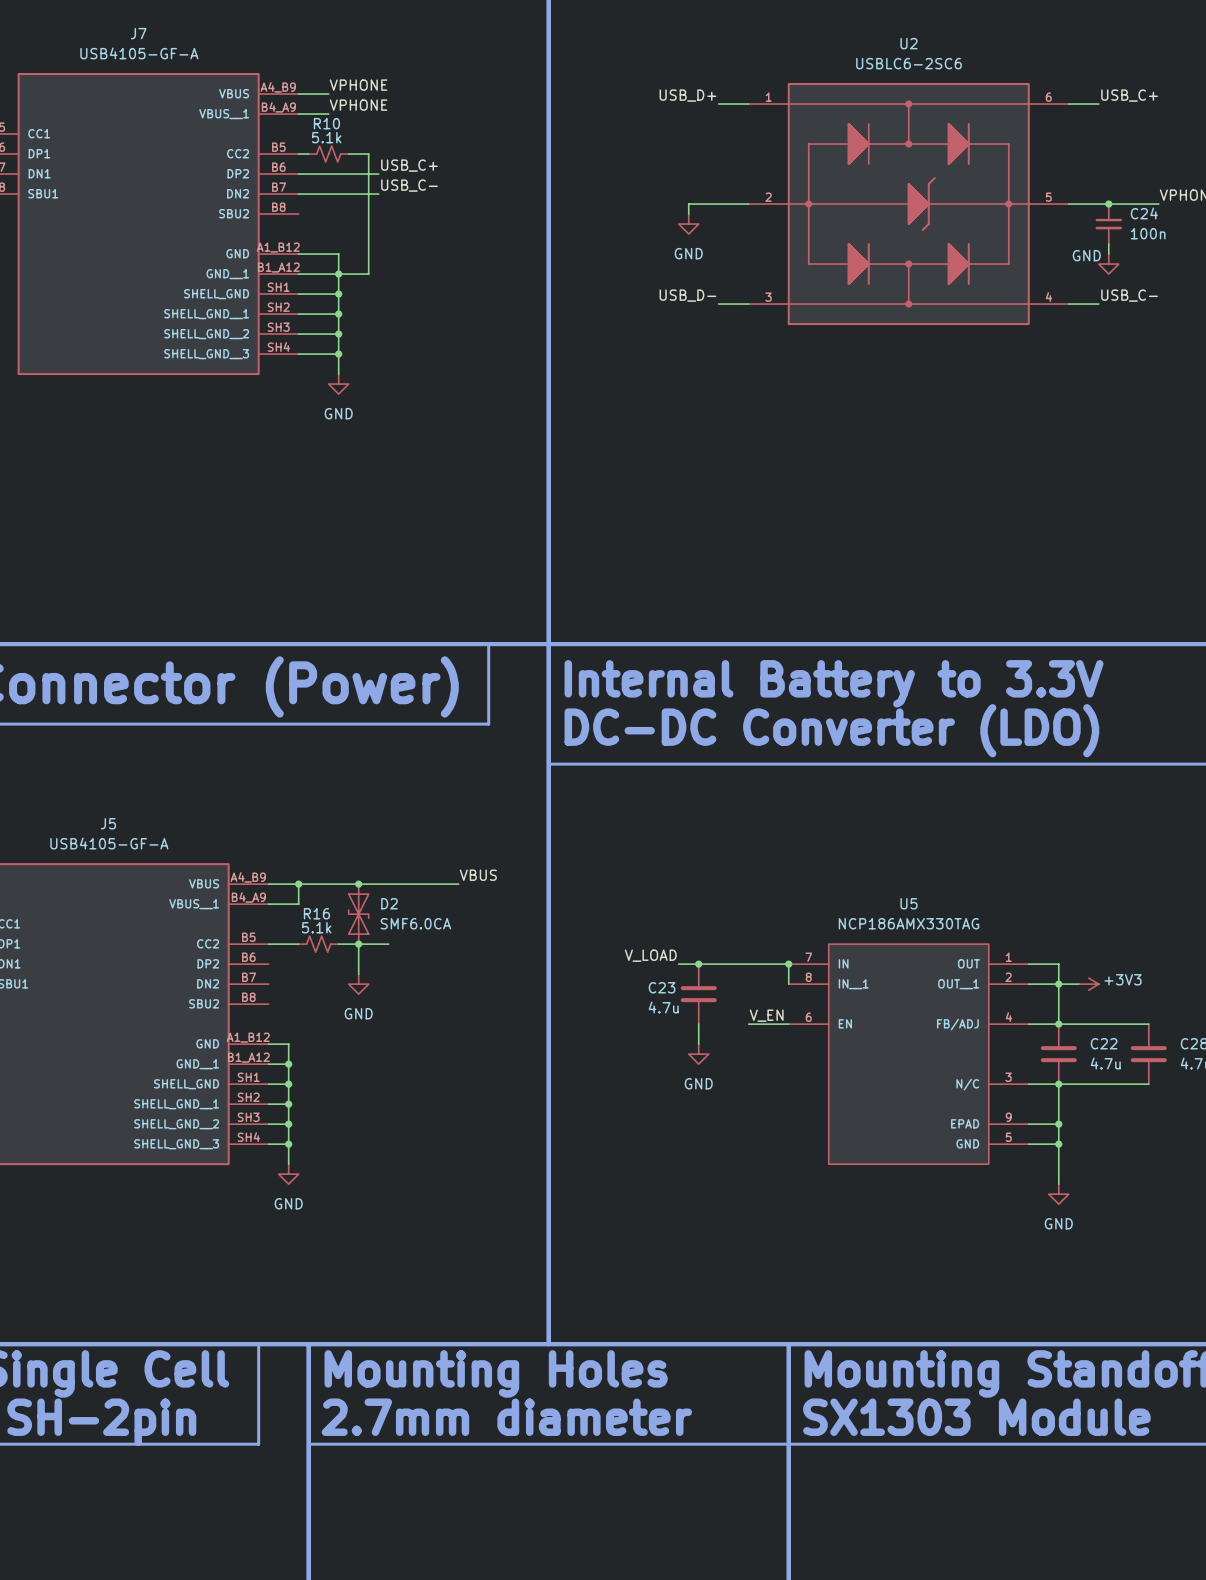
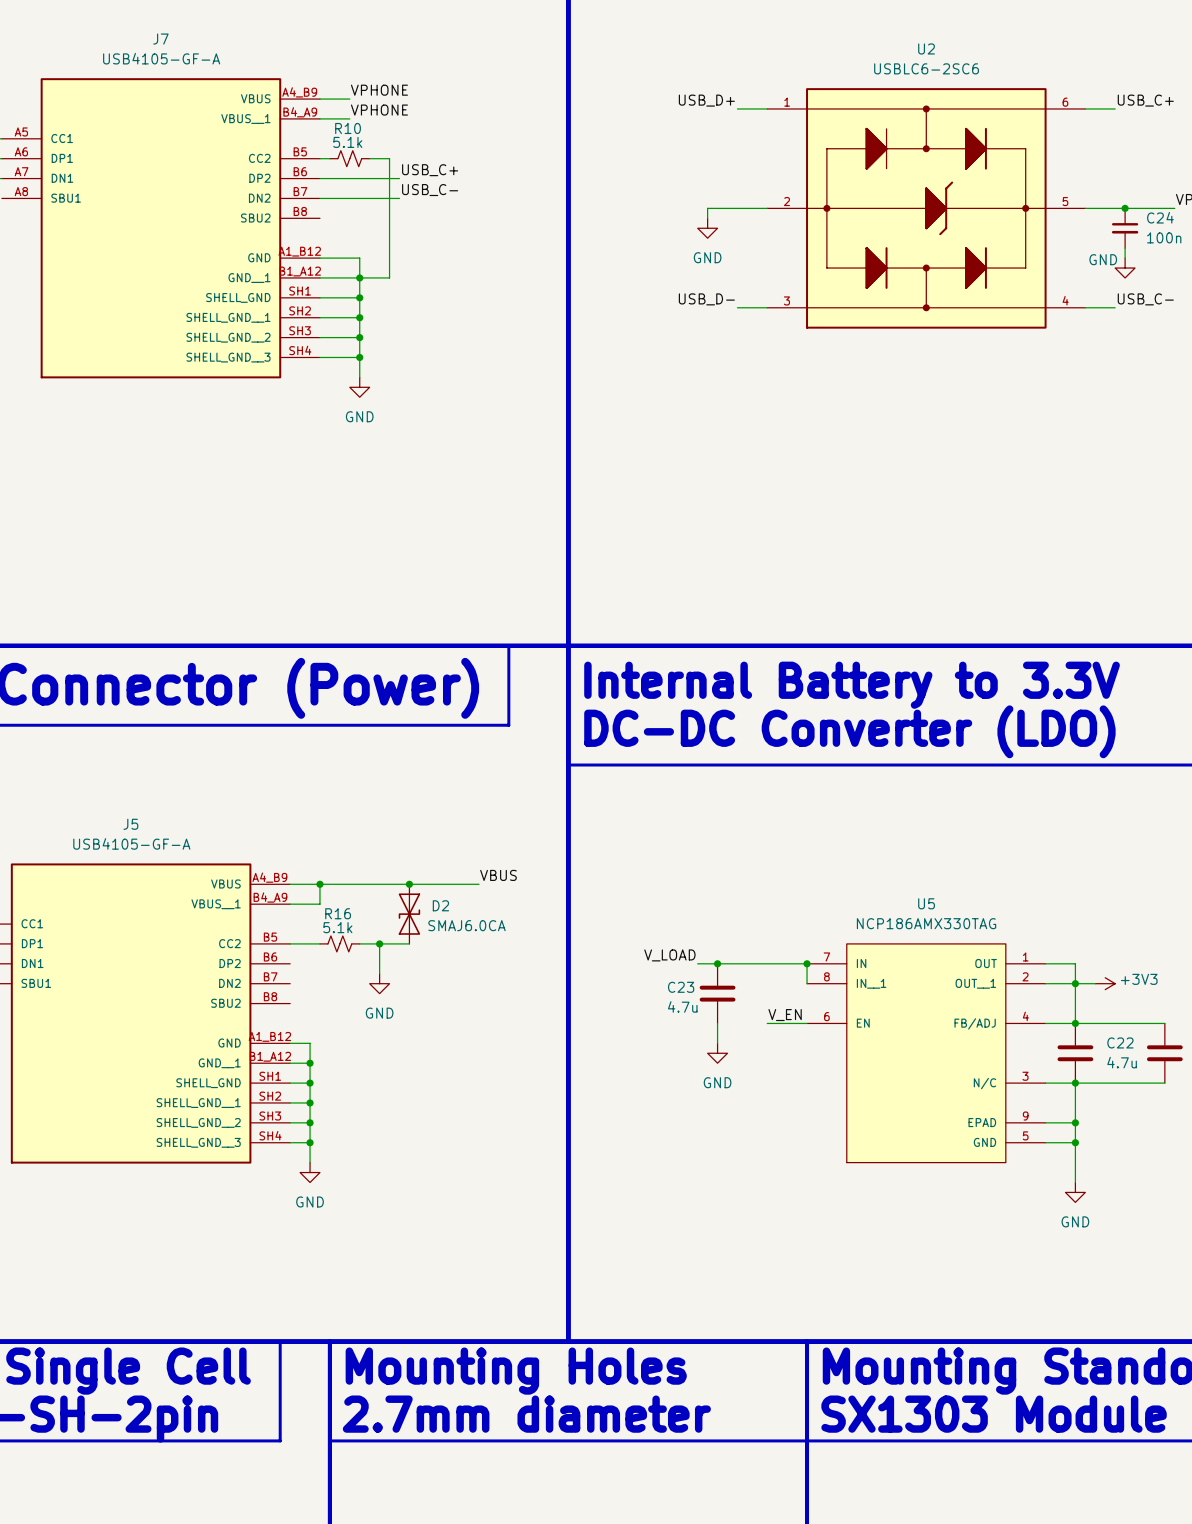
junction position: (358, 884) -> (409, 884)
D2 flip: as is (358, 914) -> left-right (409, 914)
D2 value: SMF6.0CA (415, 923) -> SMAJ6.0CA (467, 925)

